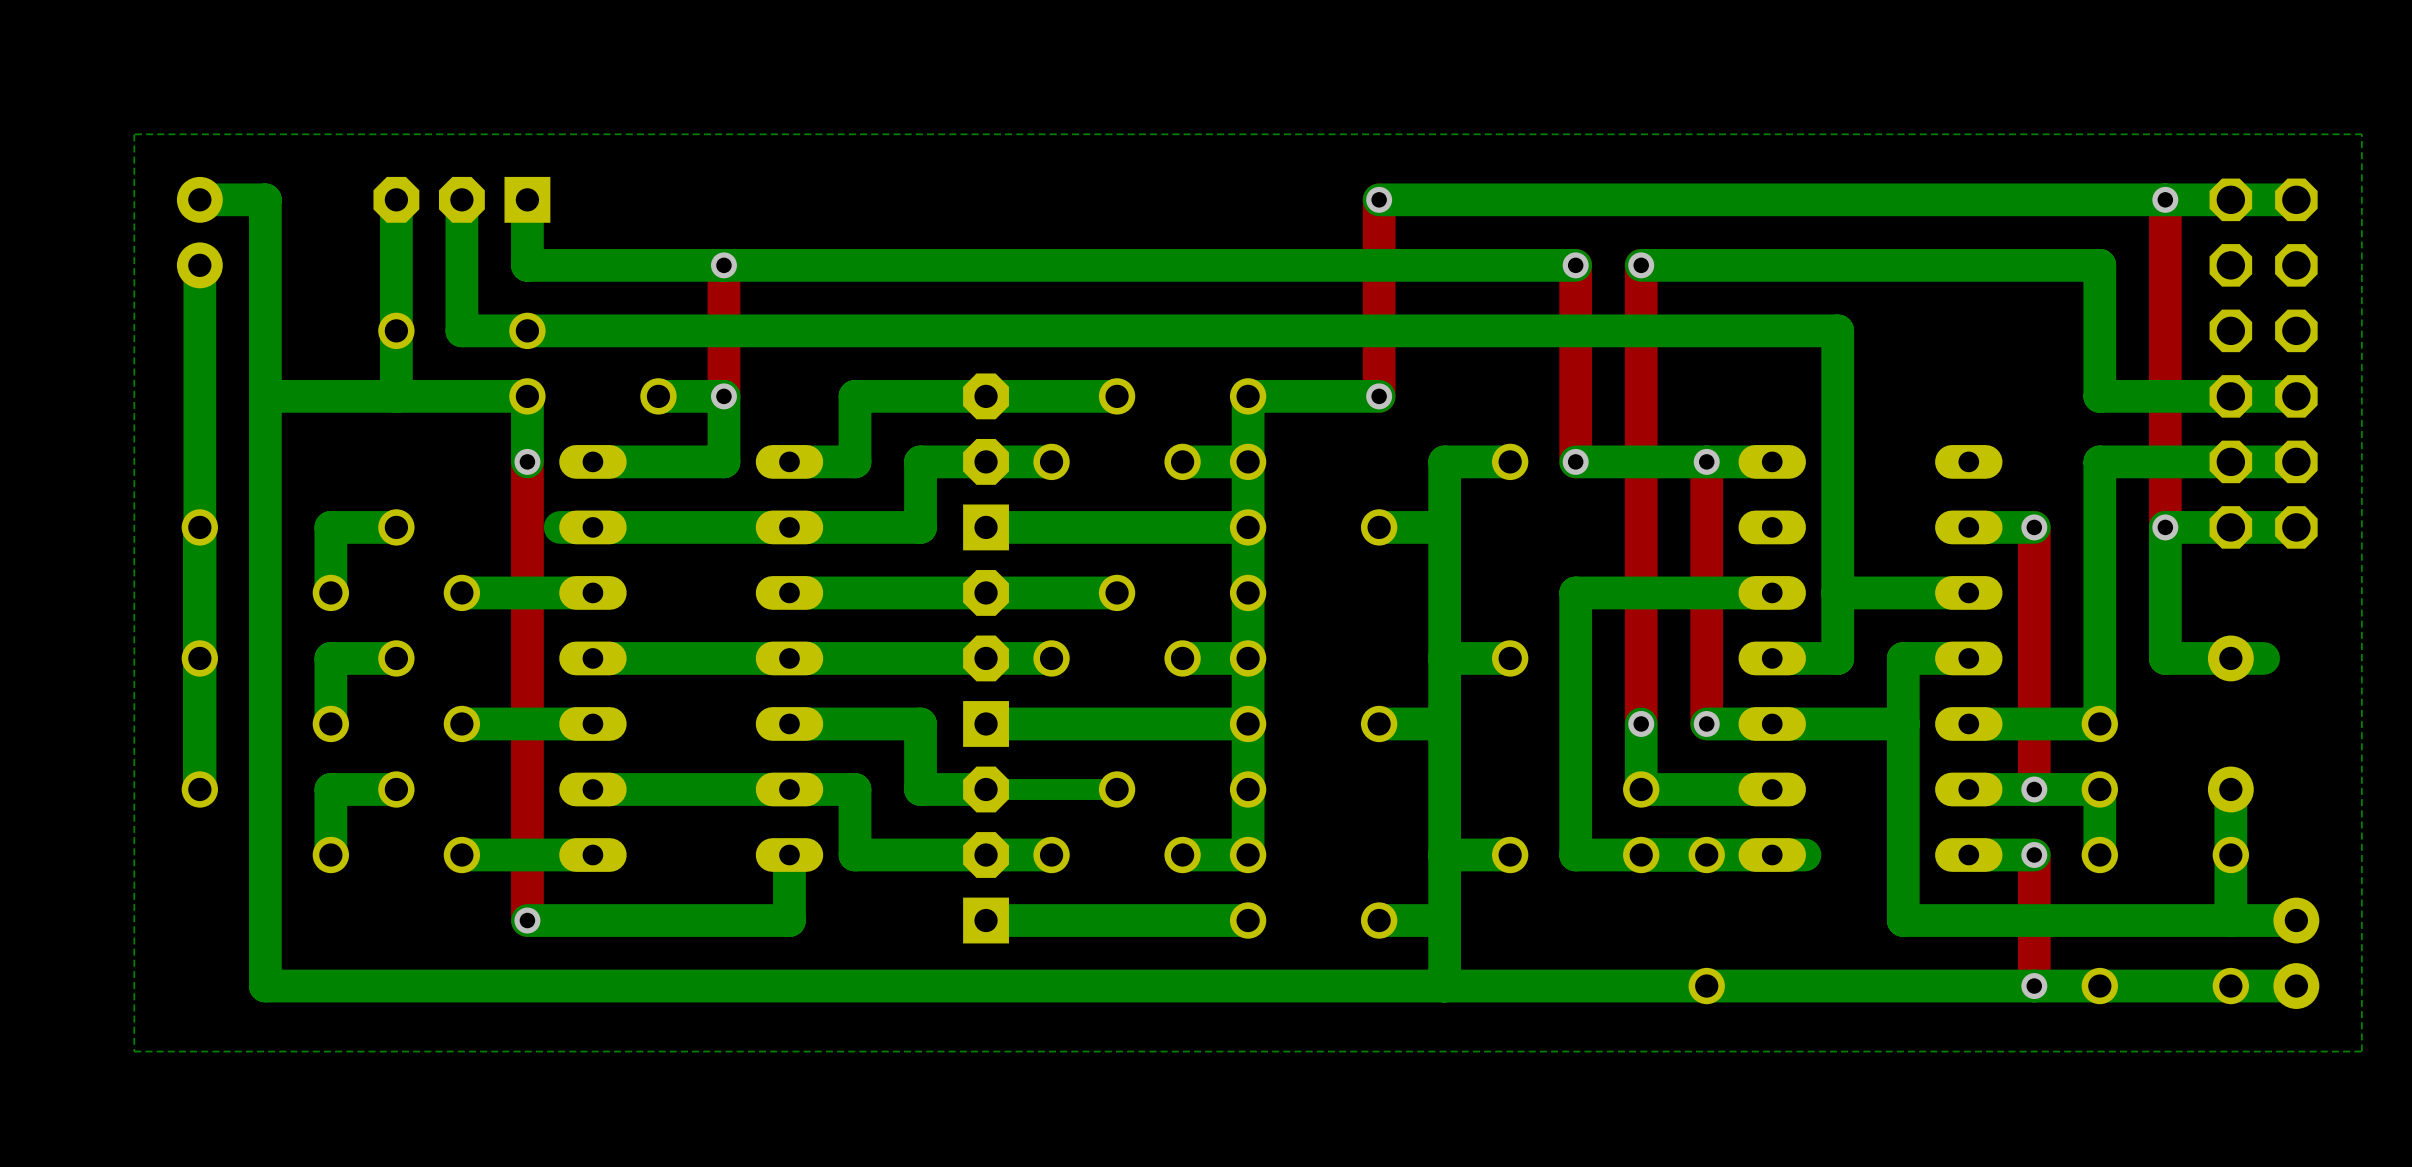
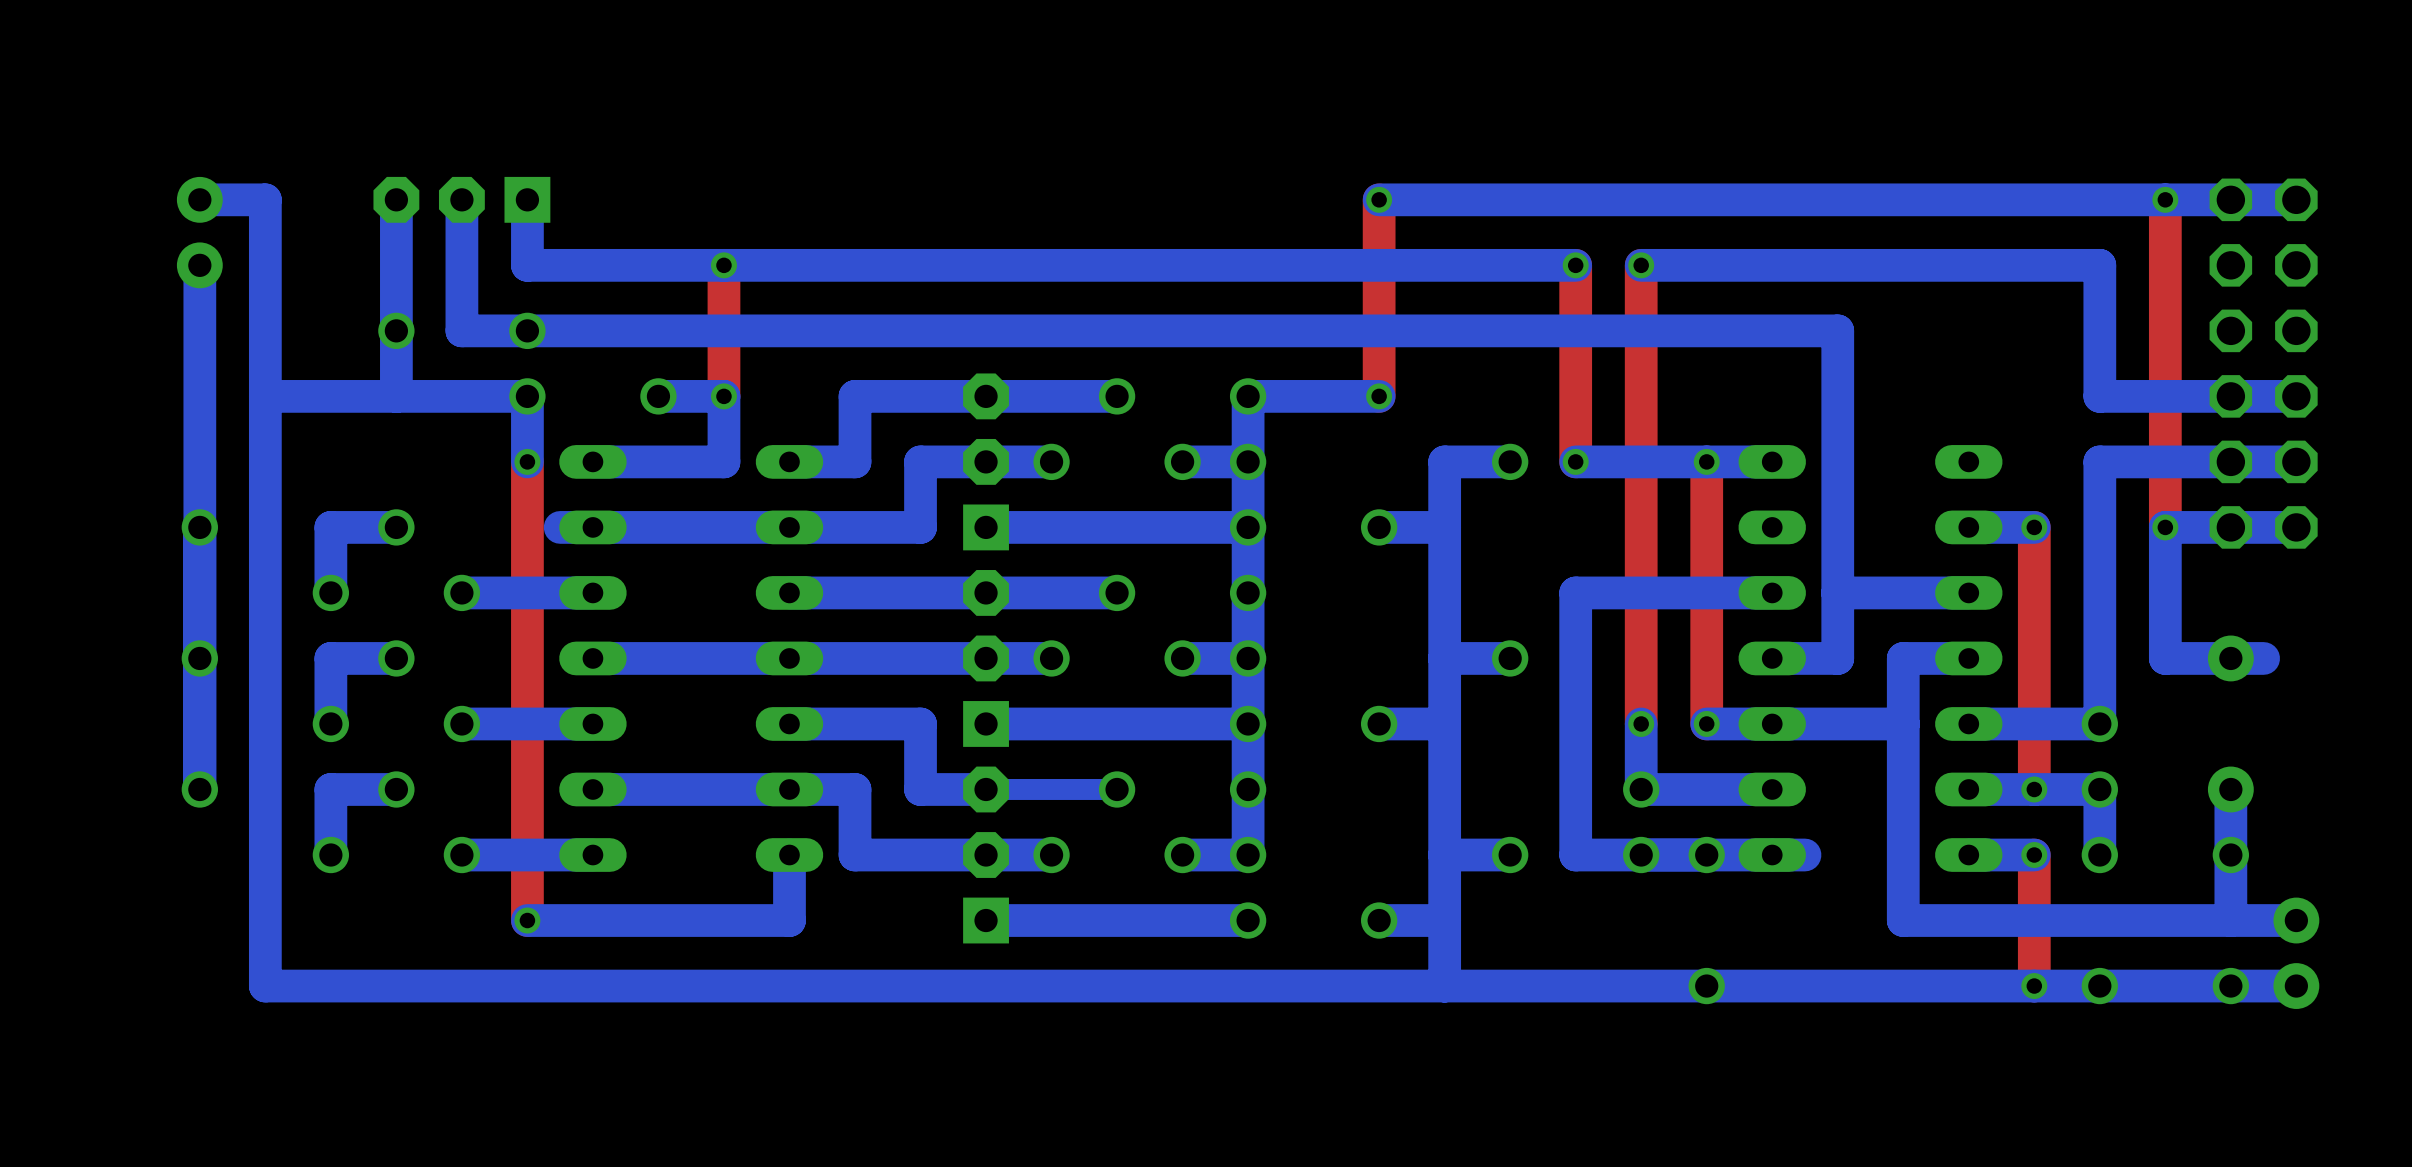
bottom zone outline: (2361, 134) (2361, 1051) (134, 1051) (134, 134) (2361, 134) -> none

